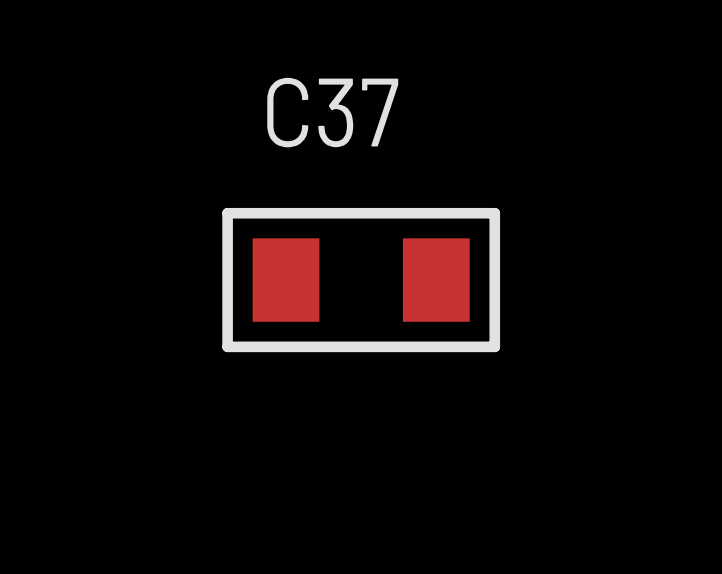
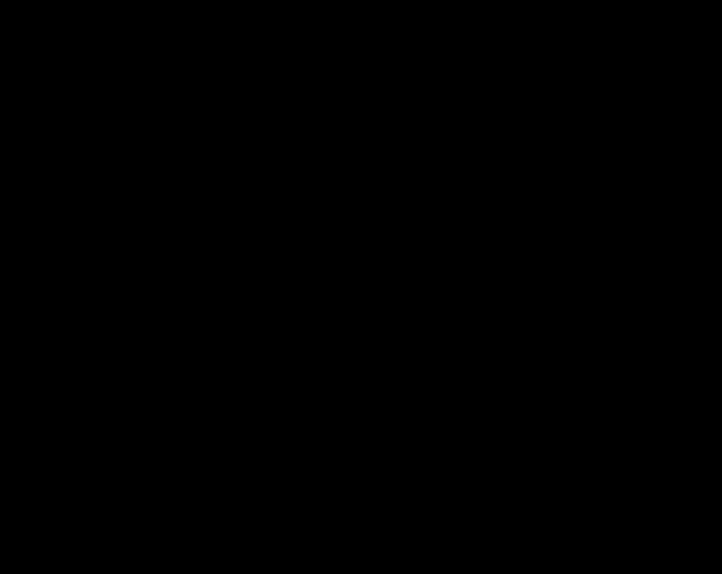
C37: (361, 280) -> none

